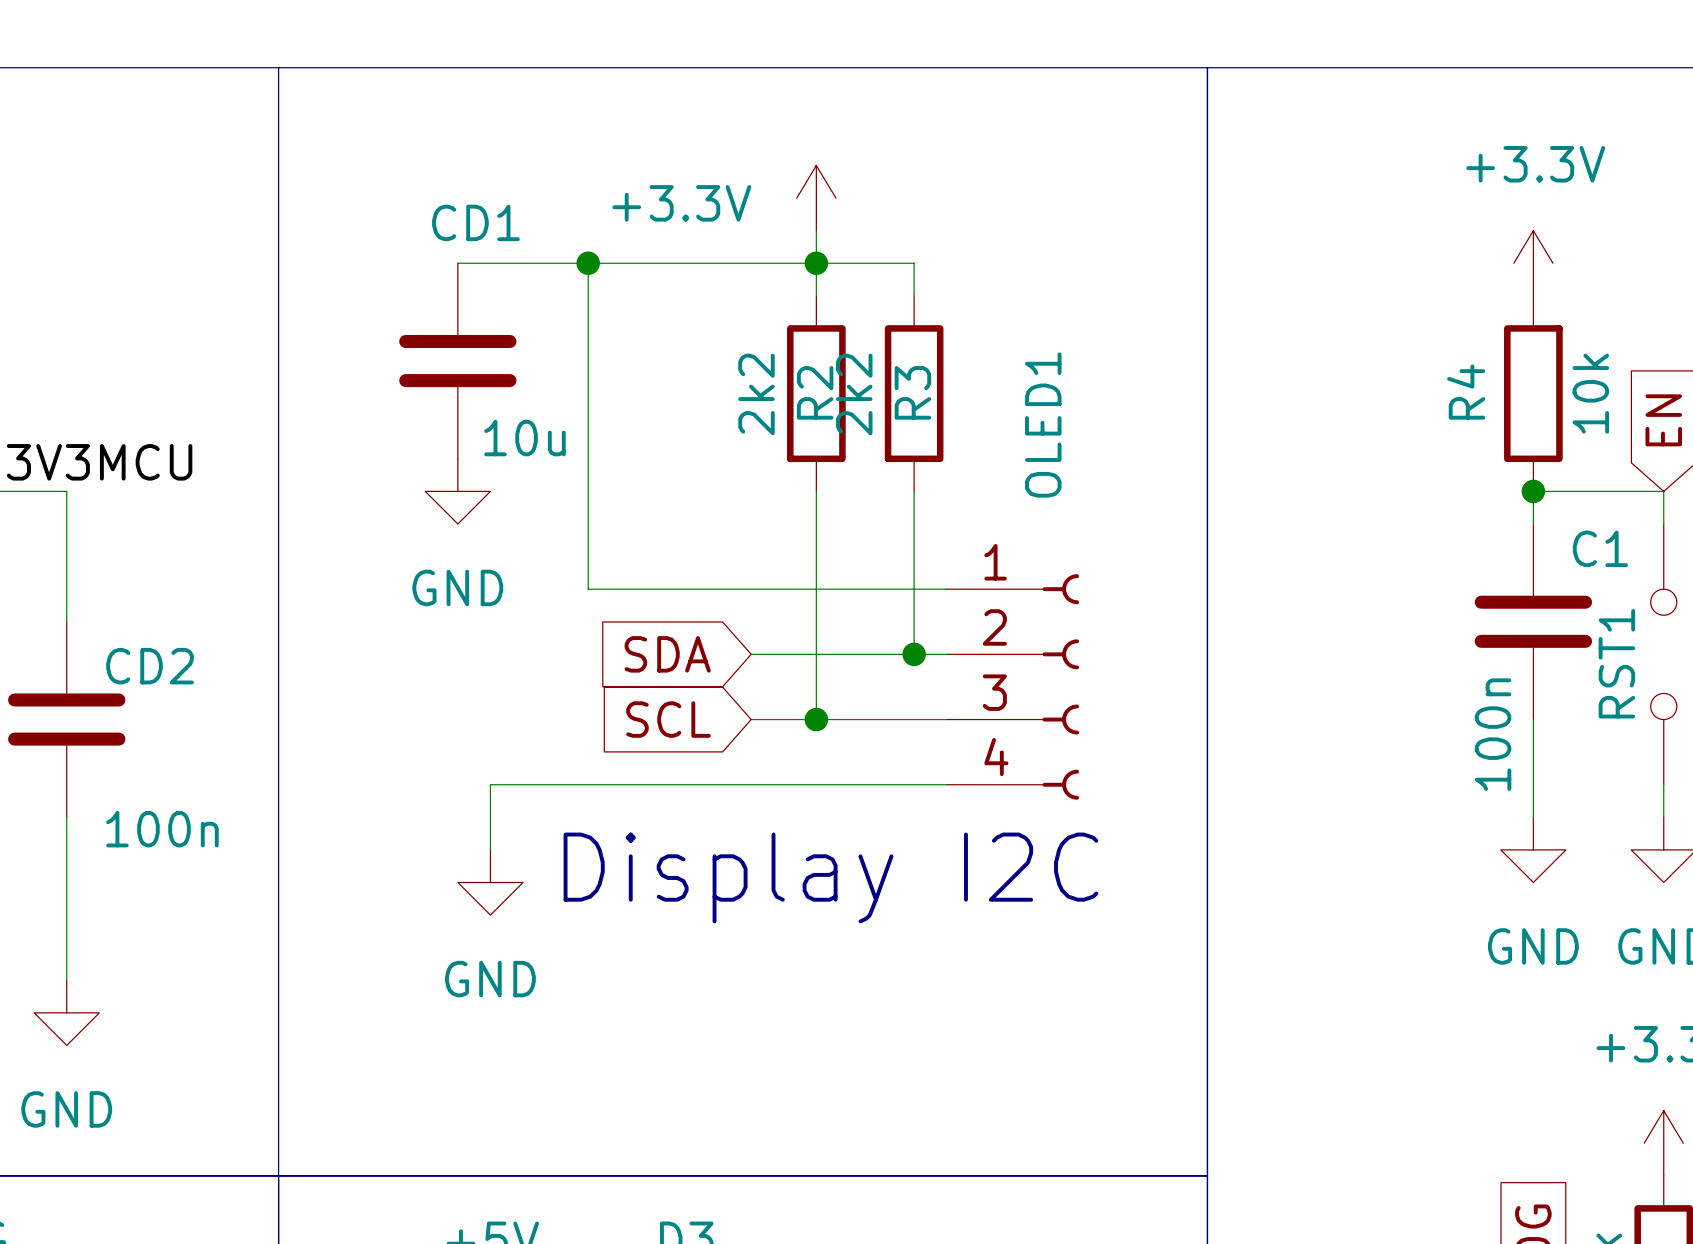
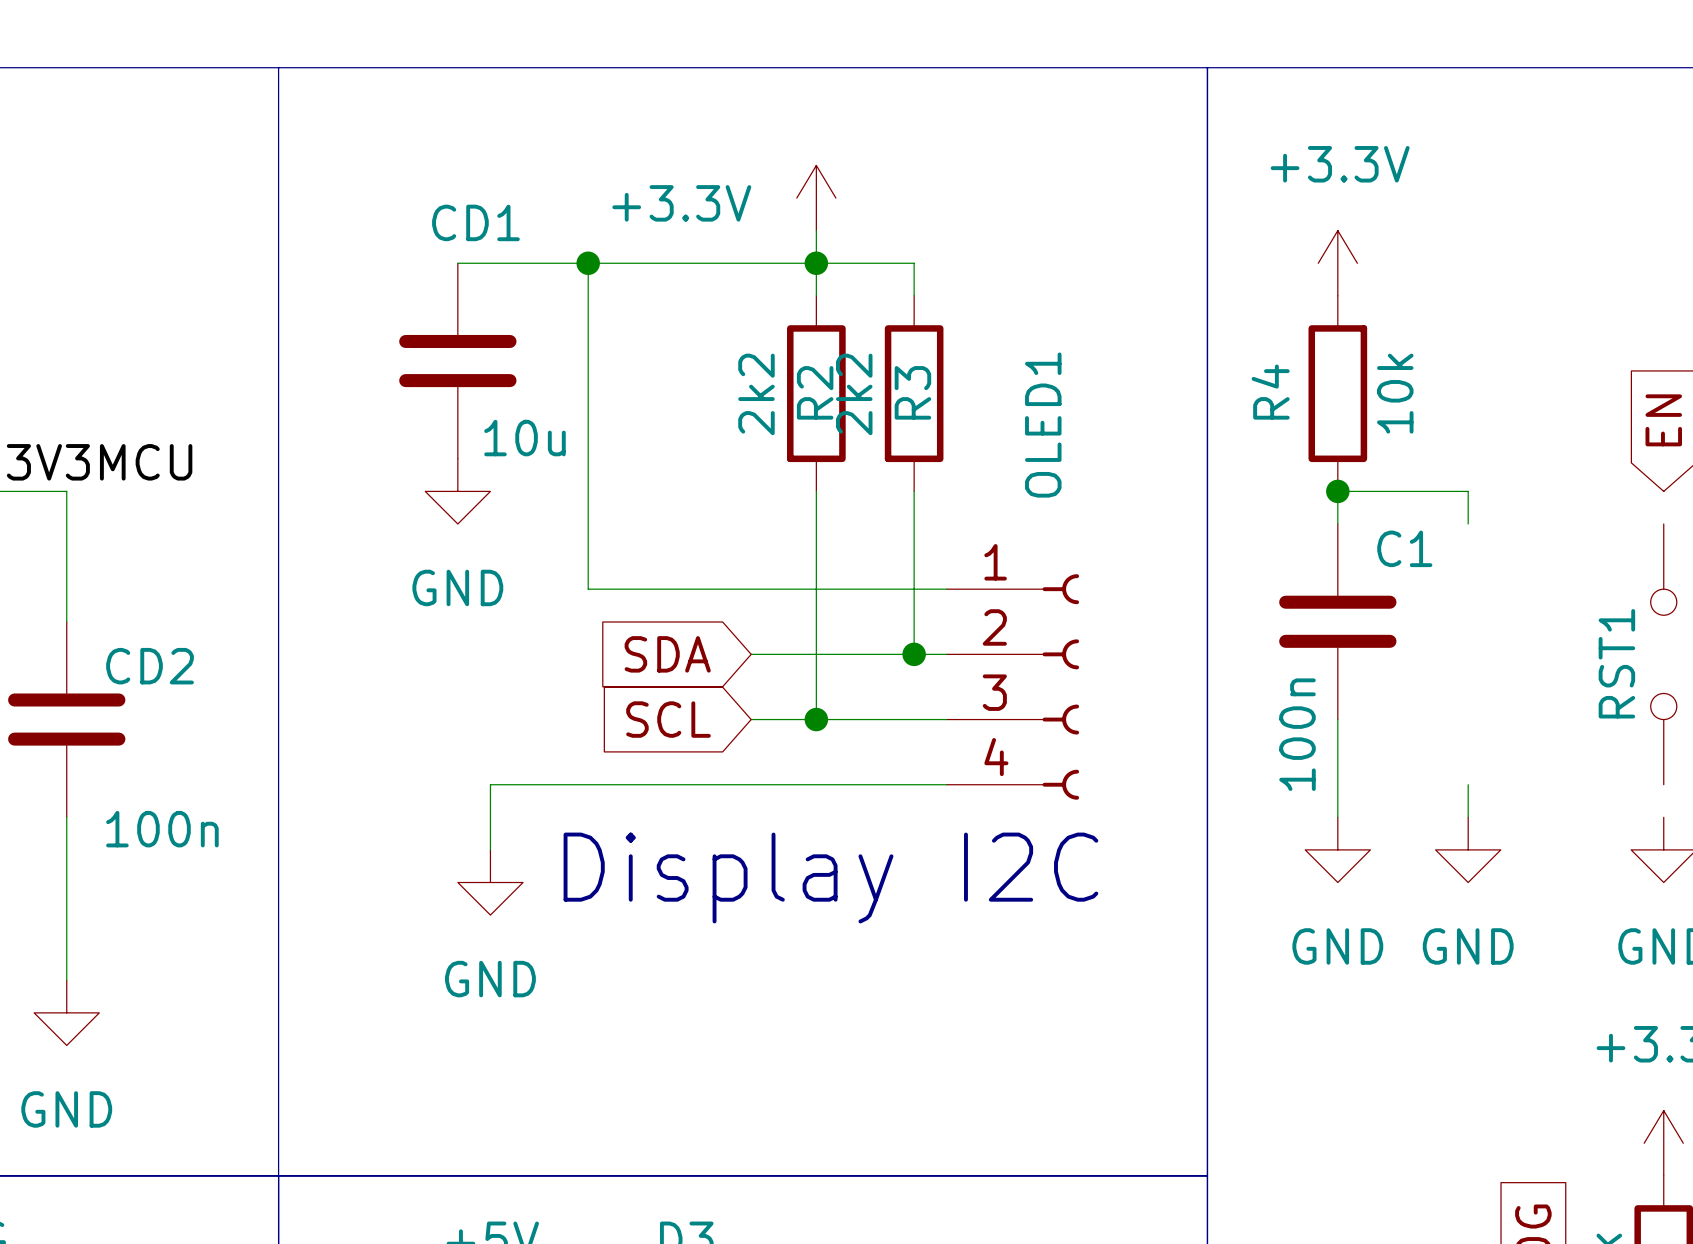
power symbol position: +3.3V (1533, 263) -> +3.3V (1337, 263)
R4 position: (1533, 393) -> (1337, 393)
junction: none -> (1337, 491)
junction: (1533, 491) -> none
wire: (1533, 523) (1533, 491) (1663, 491) (1663, 523) -> (1337, 523) (1337, 491) (1468, 491) (1468, 523)
C1 position: (1533, 621) -> (1337, 621)
wire: (1533, 719) (1533, 817) -> (1337, 719) (1337, 817)
wire: (1663, 784) (1663, 817) -> (1468, 784) (1468, 817)
power symbol: none -> GND (1337, 849)
power symbol position: GND (1533, 849) -> GND (1468, 849)

